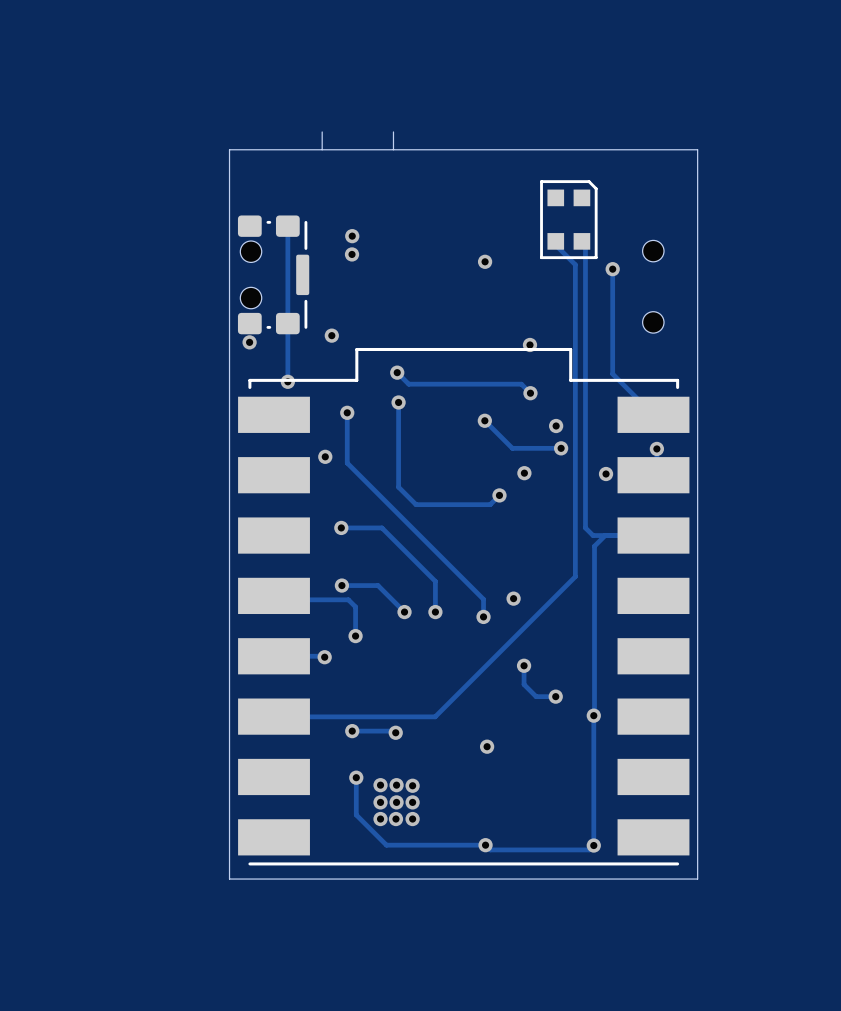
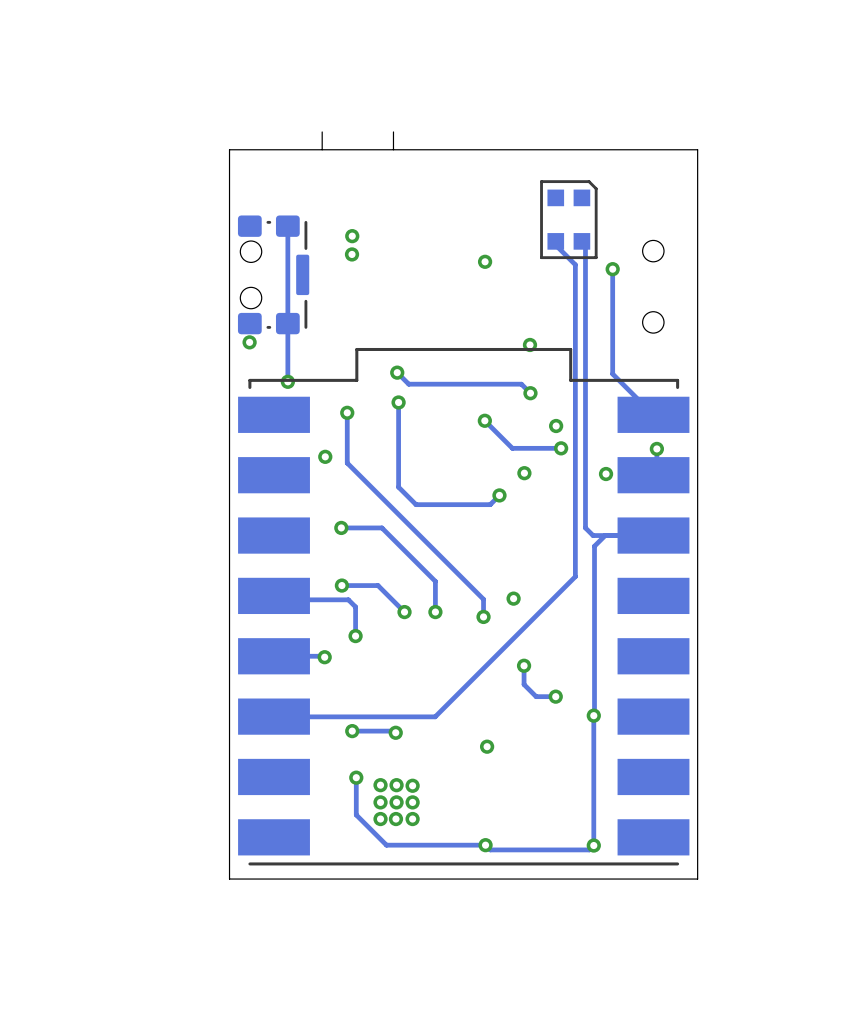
via: (331, 335) -> none

